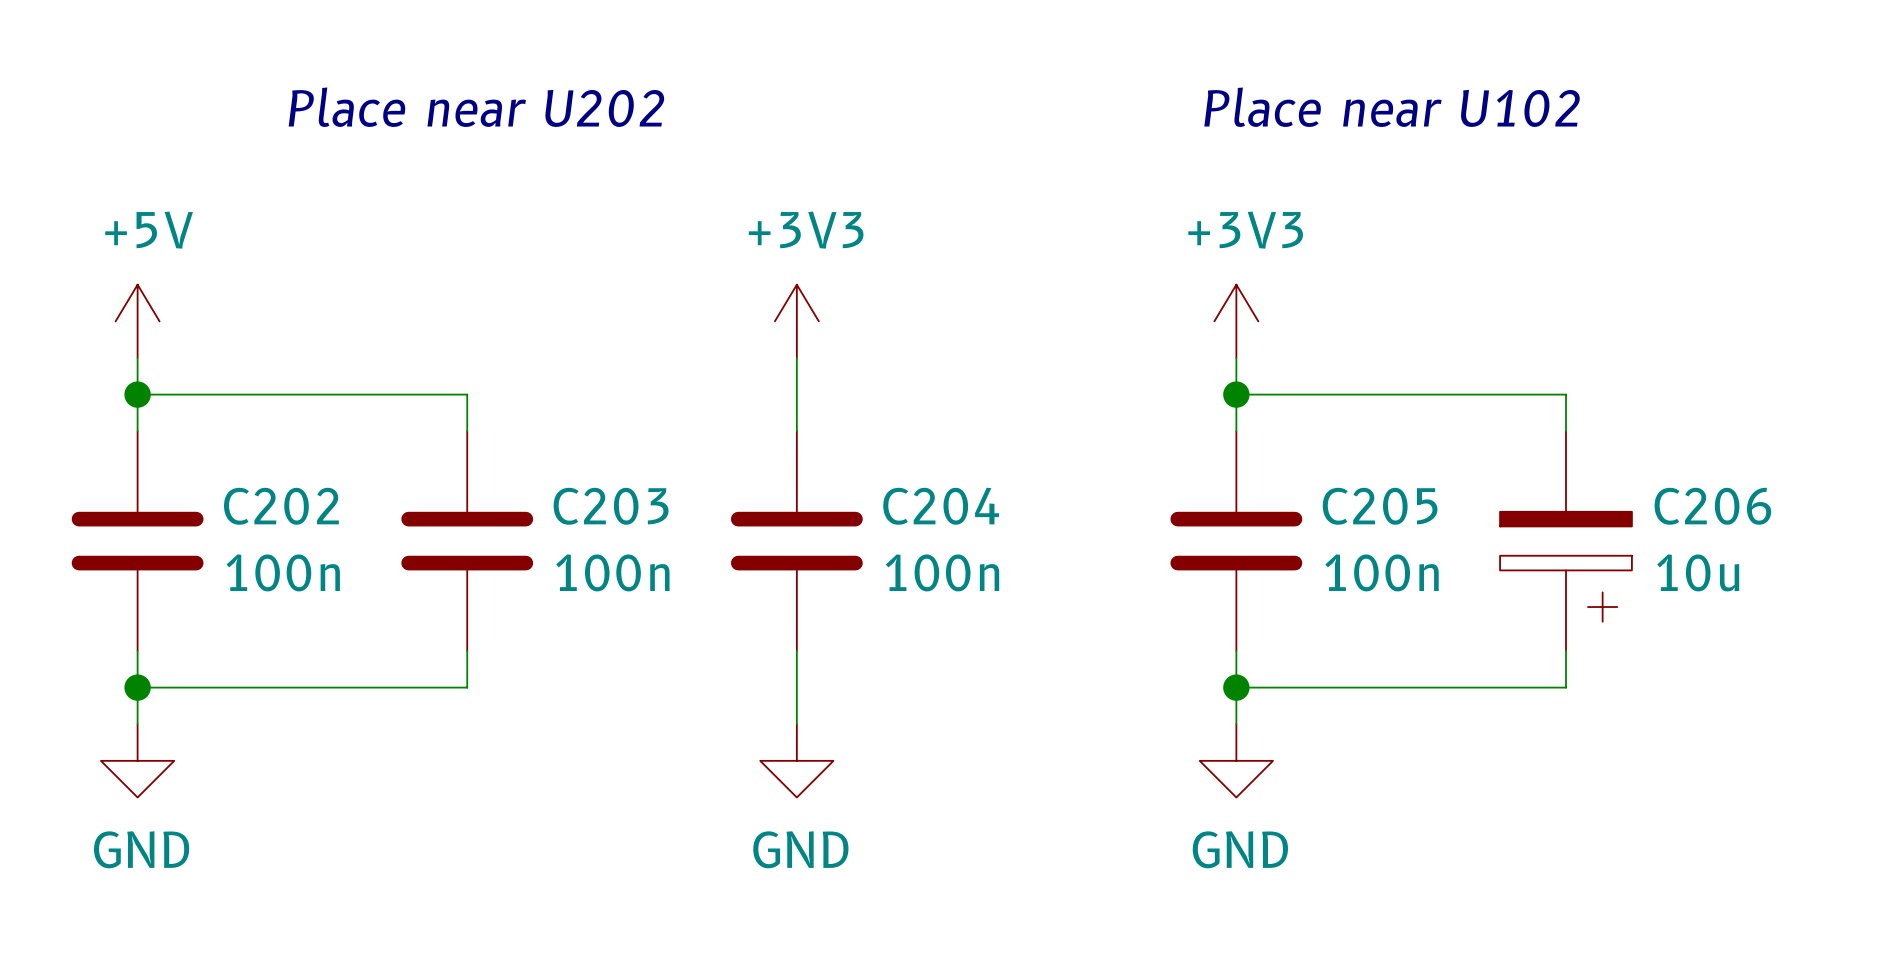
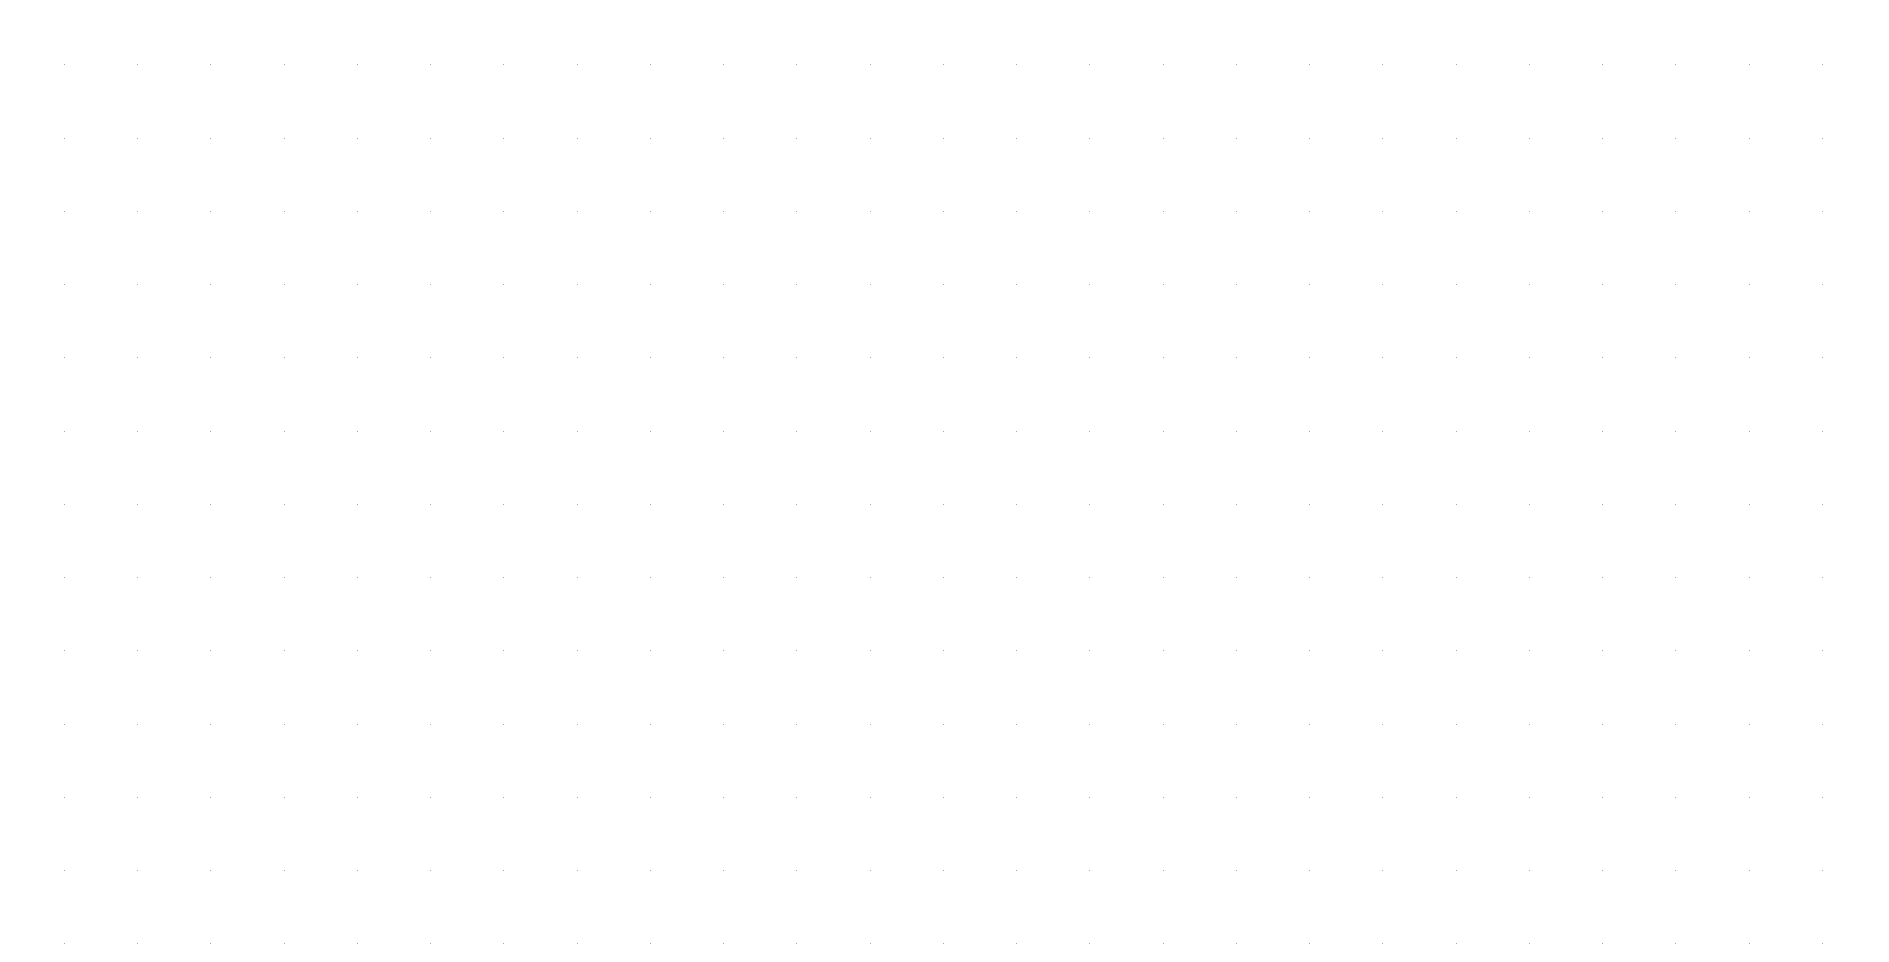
text: Place near U202 (476, 107) -> none
text: Place near U102 (1392, 107) -> none
power symbol: +5V (137, 321) -> none
power symbol: +3V3 (796, 321) -> none
power symbol: +3V3 (1236, 321) -> none
wire: (137, 357) (137, 431) -> none
wire: (796, 357) (796, 431) -> none
wire: (1236, 357) (1236, 431) -> none
wire: (137, 394) (467, 394) (467, 431) -> none
junction: (137, 394) -> none
wire: (1236, 394) (1566, 394) (1566, 431) -> none
junction: (1236, 394) -> none
C202: 100n (137, 541) -> none
C203: 100n (467, 541) -> none
C204: 100n (796, 541) -> none
C205: 100n (1236, 541) -> none
C206: 10u (1566, 541) -> none
wire: (137, 650) (137, 724) -> none
wire: (467, 650) (467, 687) (137, 687) -> none
wire: (796, 650) (796, 724) -> none
wire: (1236, 650) (1236, 724) -> none
wire: (1566, 650) (1566, 687) (1236, 687) -> none
junction: (137, 687) -> none
junction: (1236, 687) -> none
power symbol: GND (137, 760) -> none
power symbol: GND (796, 760) -> none
power symbol: GND (1236, 760) -> none

